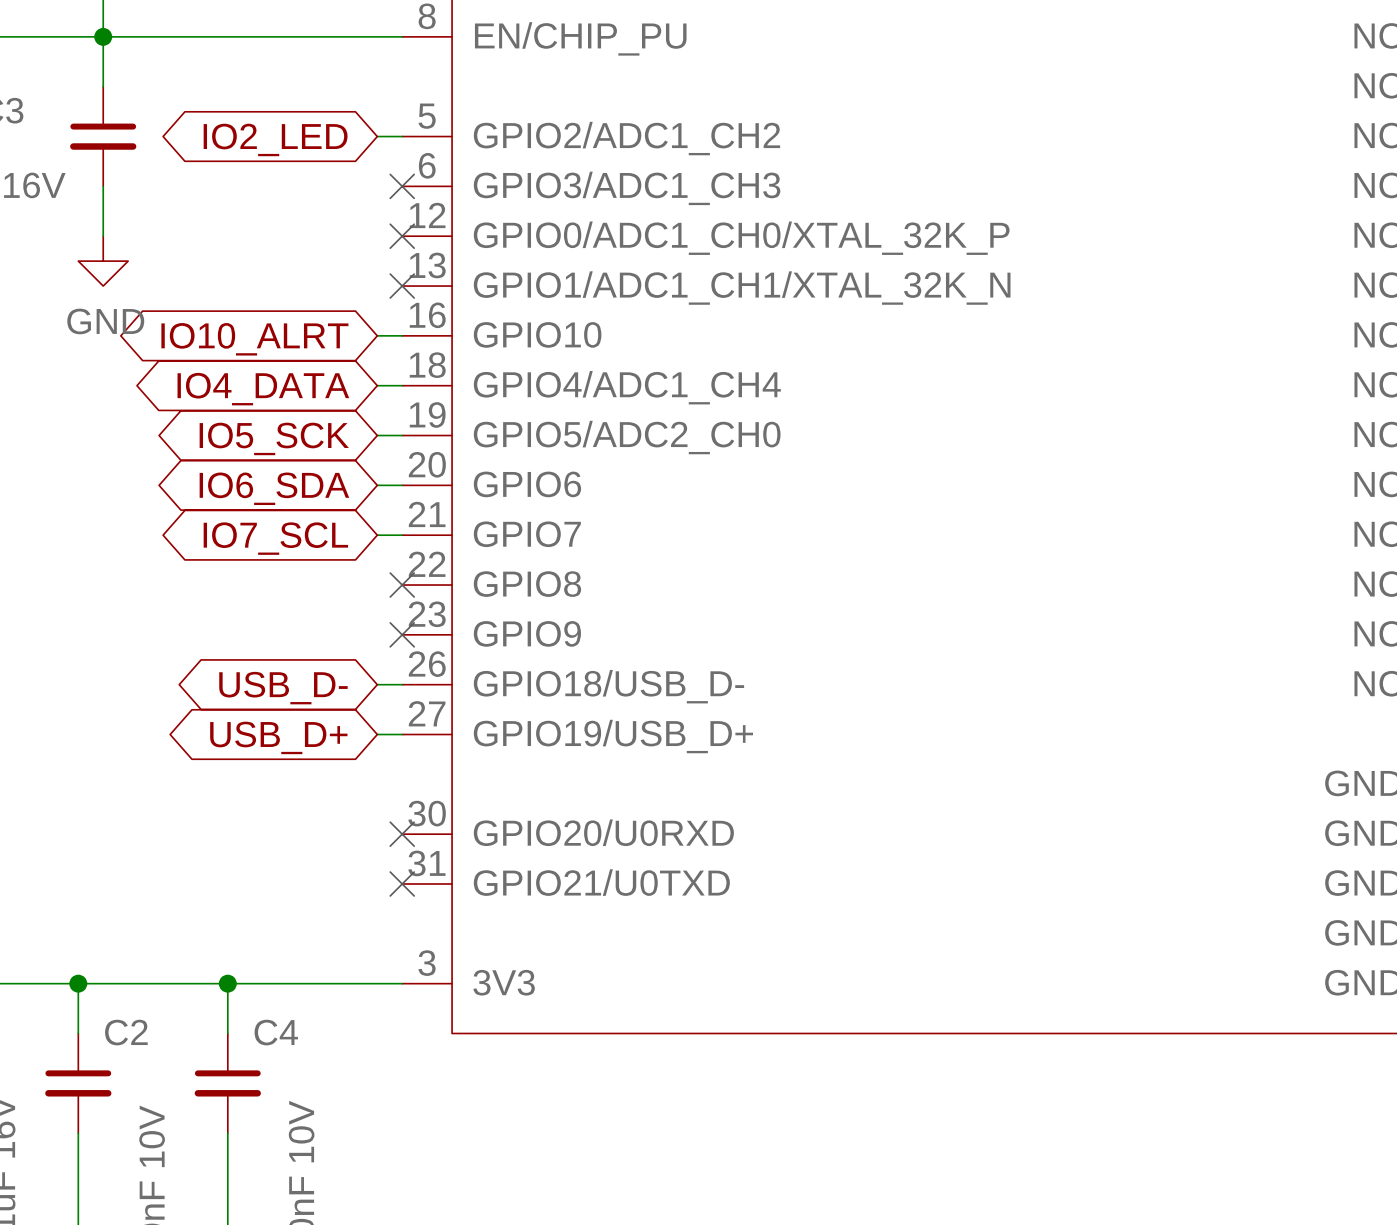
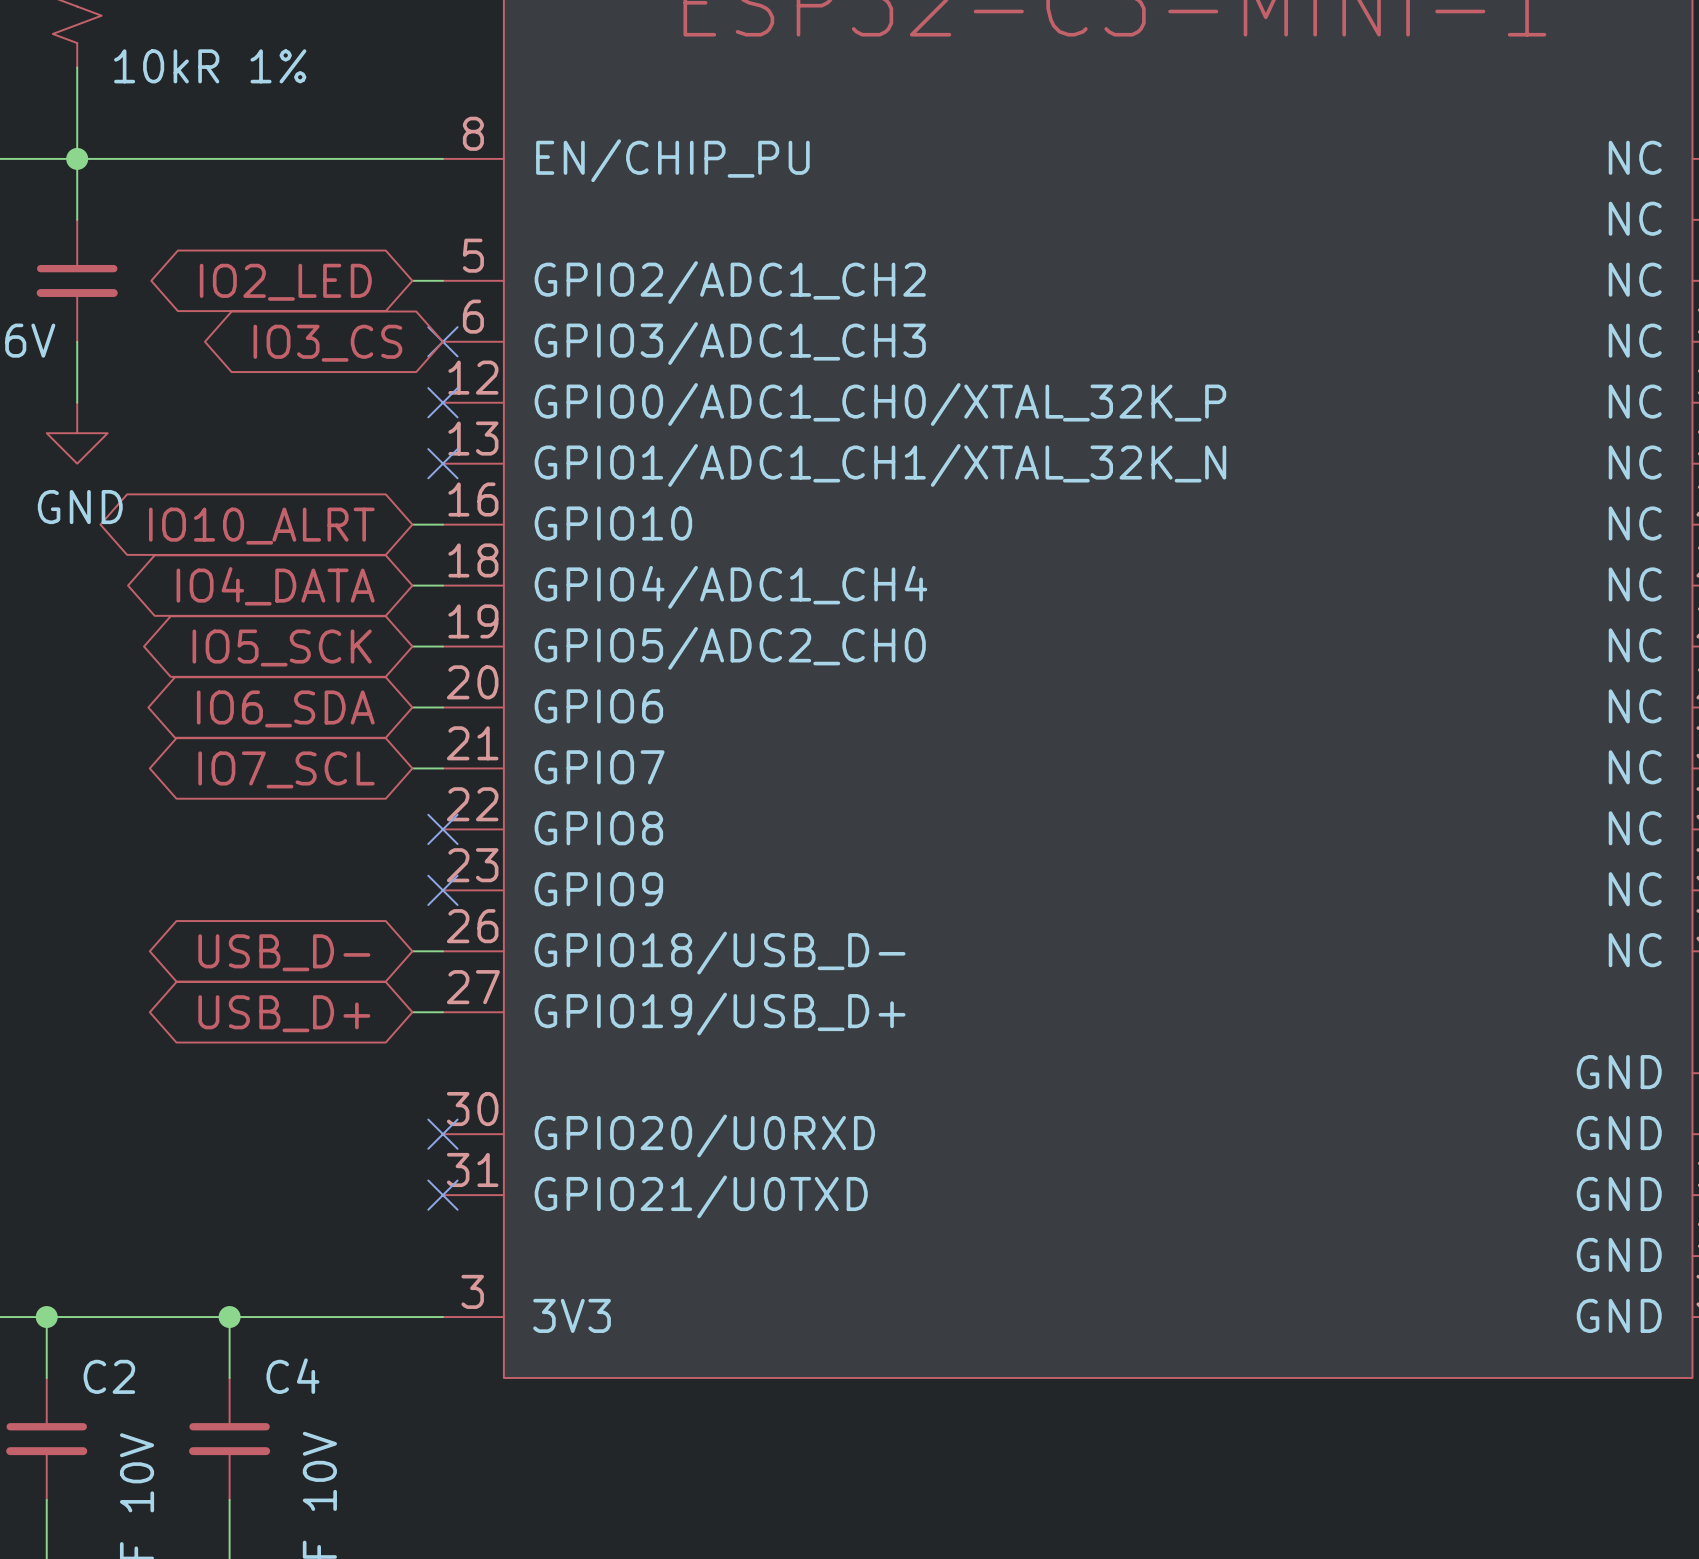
global label: none -> IO3_CS (327, 343)

